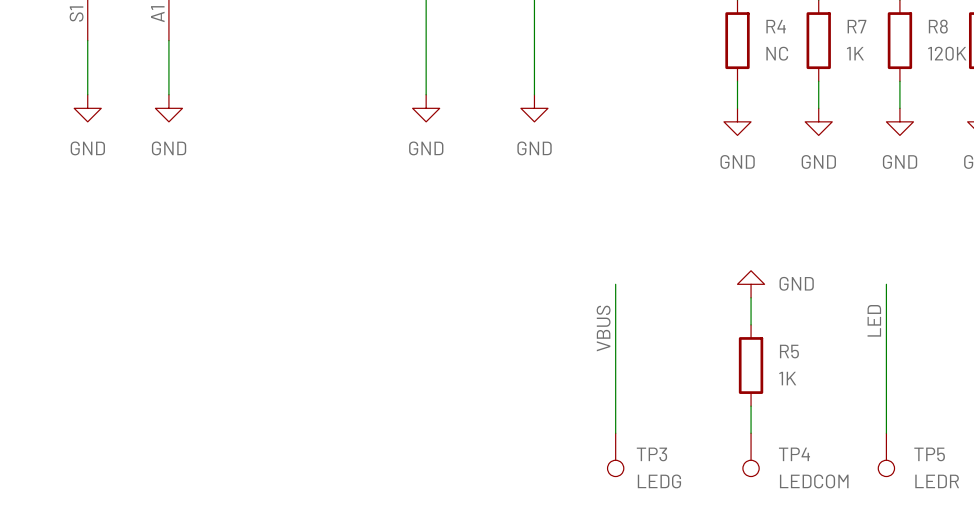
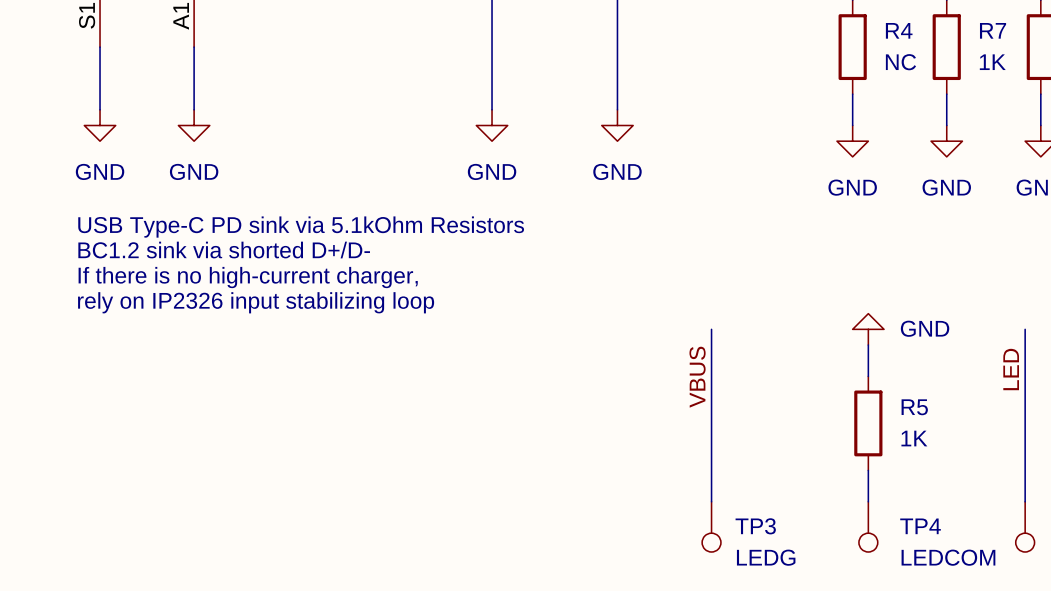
text: none -> USB Type-C PD sink via 5.1kOhm Resistors (301, 227)
text: none -> BC1.2 sink via shorted D+/D- (224, 250)
text: none -> If there is no high-current charger, (248, 277)
text: none -> rely on IP2326 input stabilizing loop (256, 302)

